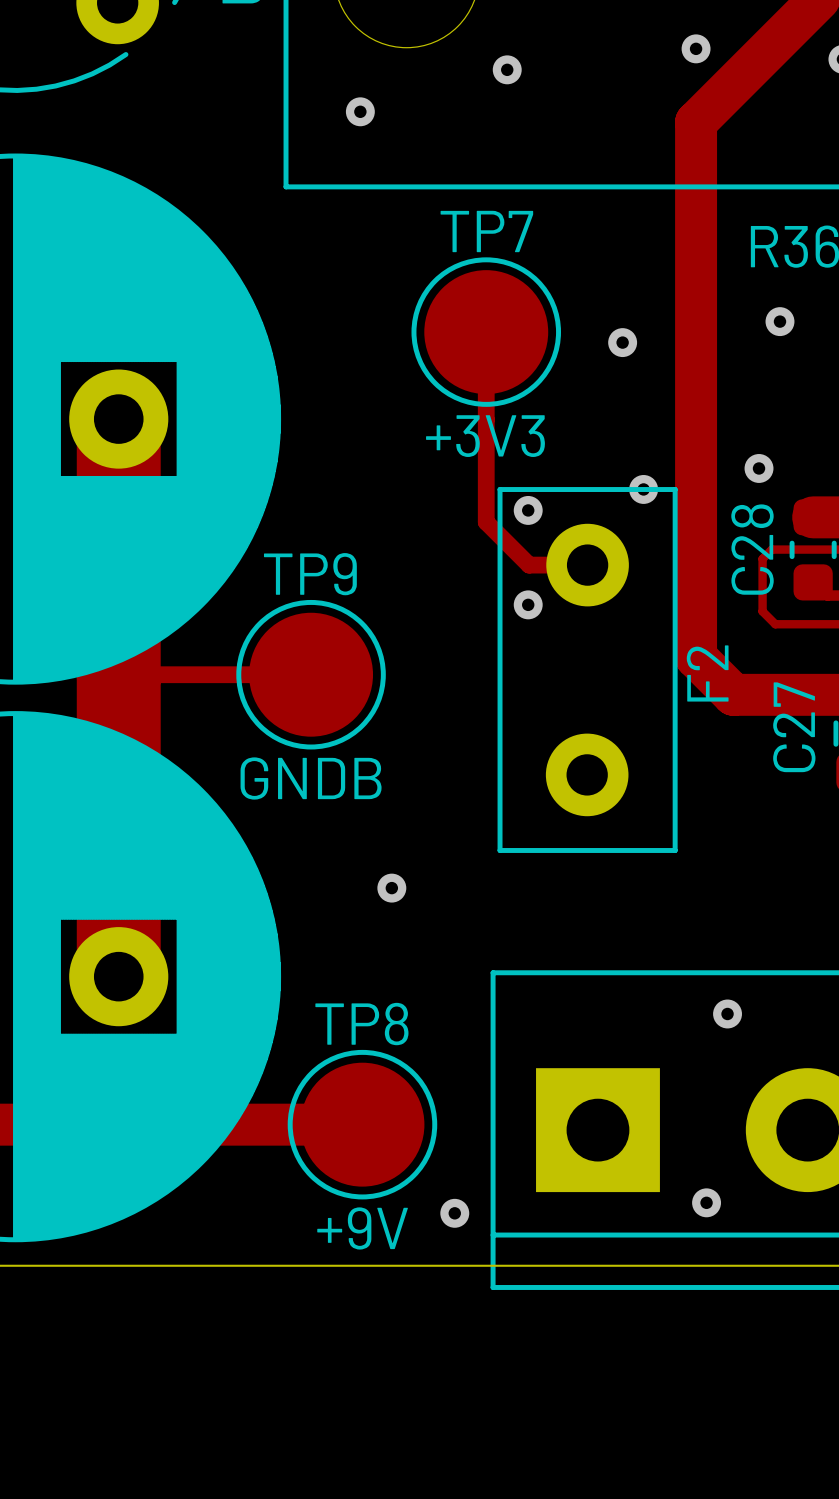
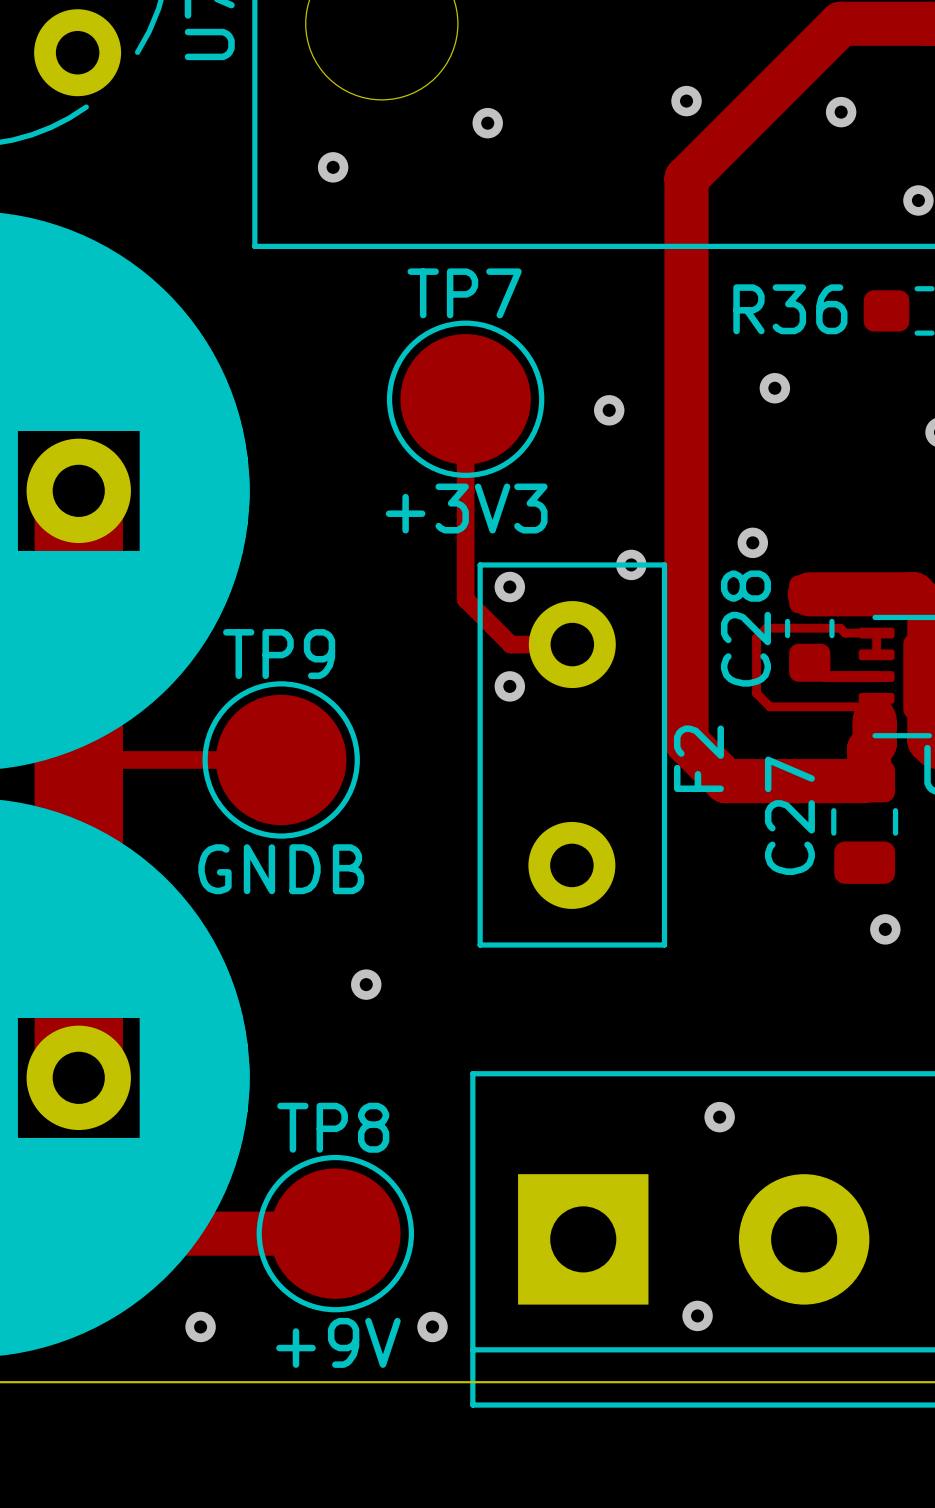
via: none -> (200, 1326)

